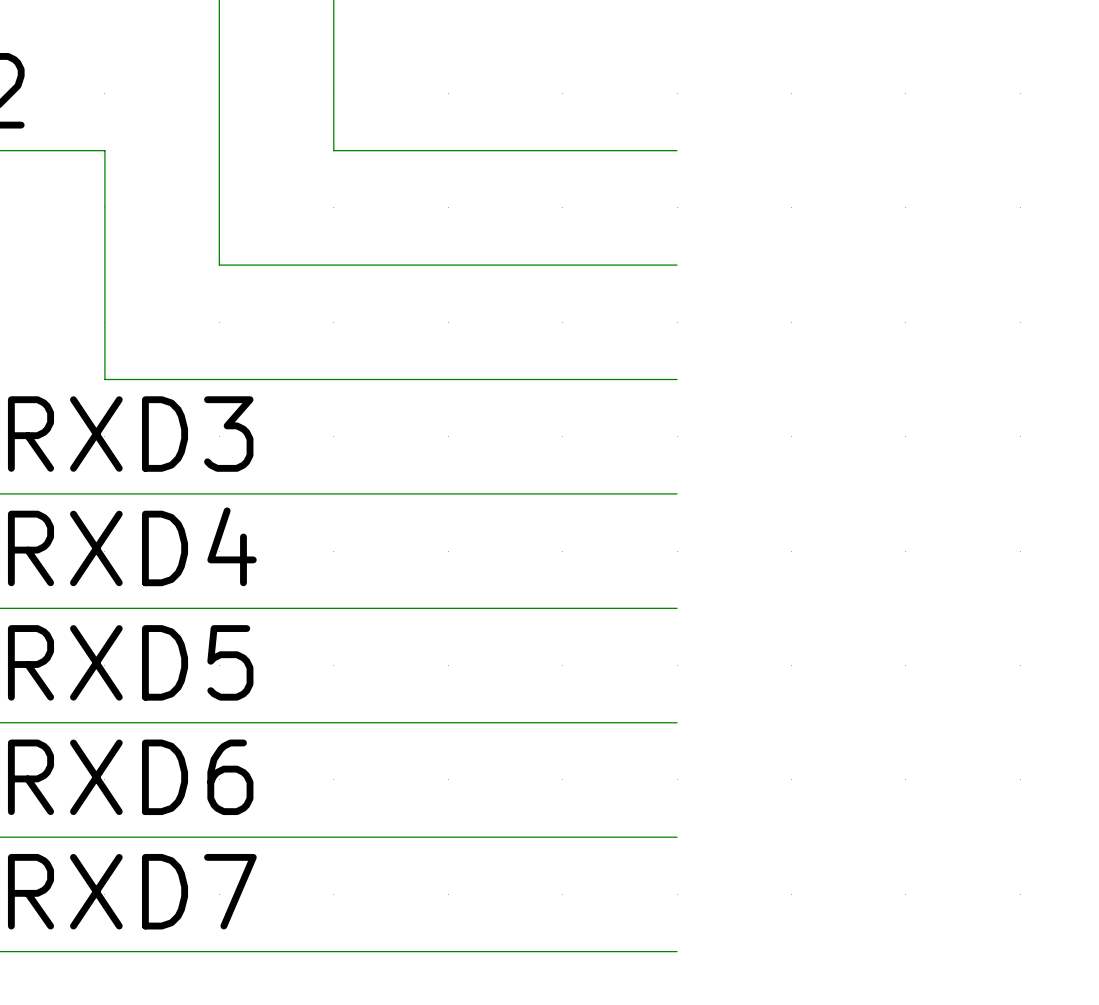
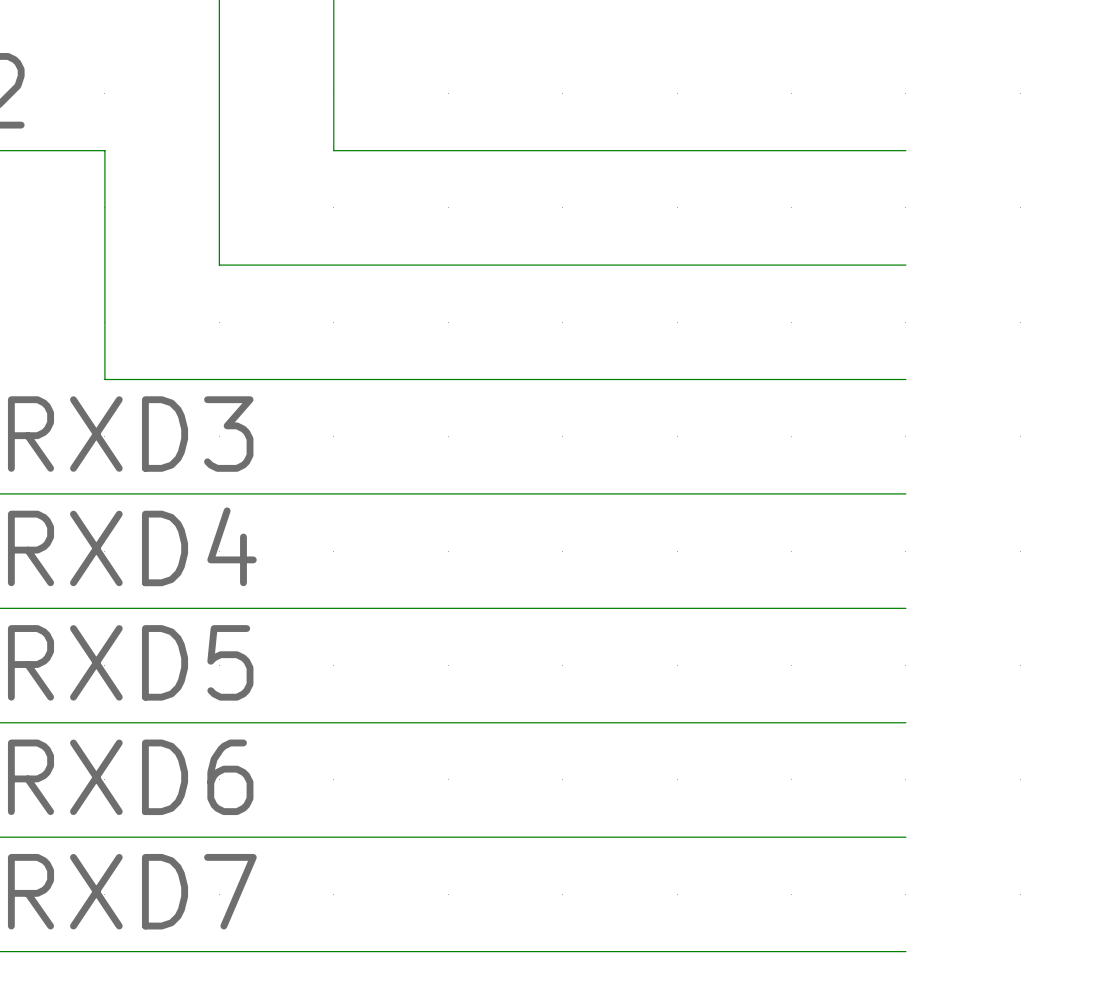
wire: none -> (677, 150) (905, 150)
wire: none -> (677, 265) (905, 265)
wire: none -> (677, 379) (905, 379)
wire: none -> (677, 493) (905, 493)
wire: none -> (677, 608) (905, 608)
wire: none -> (677, 722) (905, 722)
wire: none -> (677, 837) (905, 837)
wire: none -> (677, 951) (905, 951)

